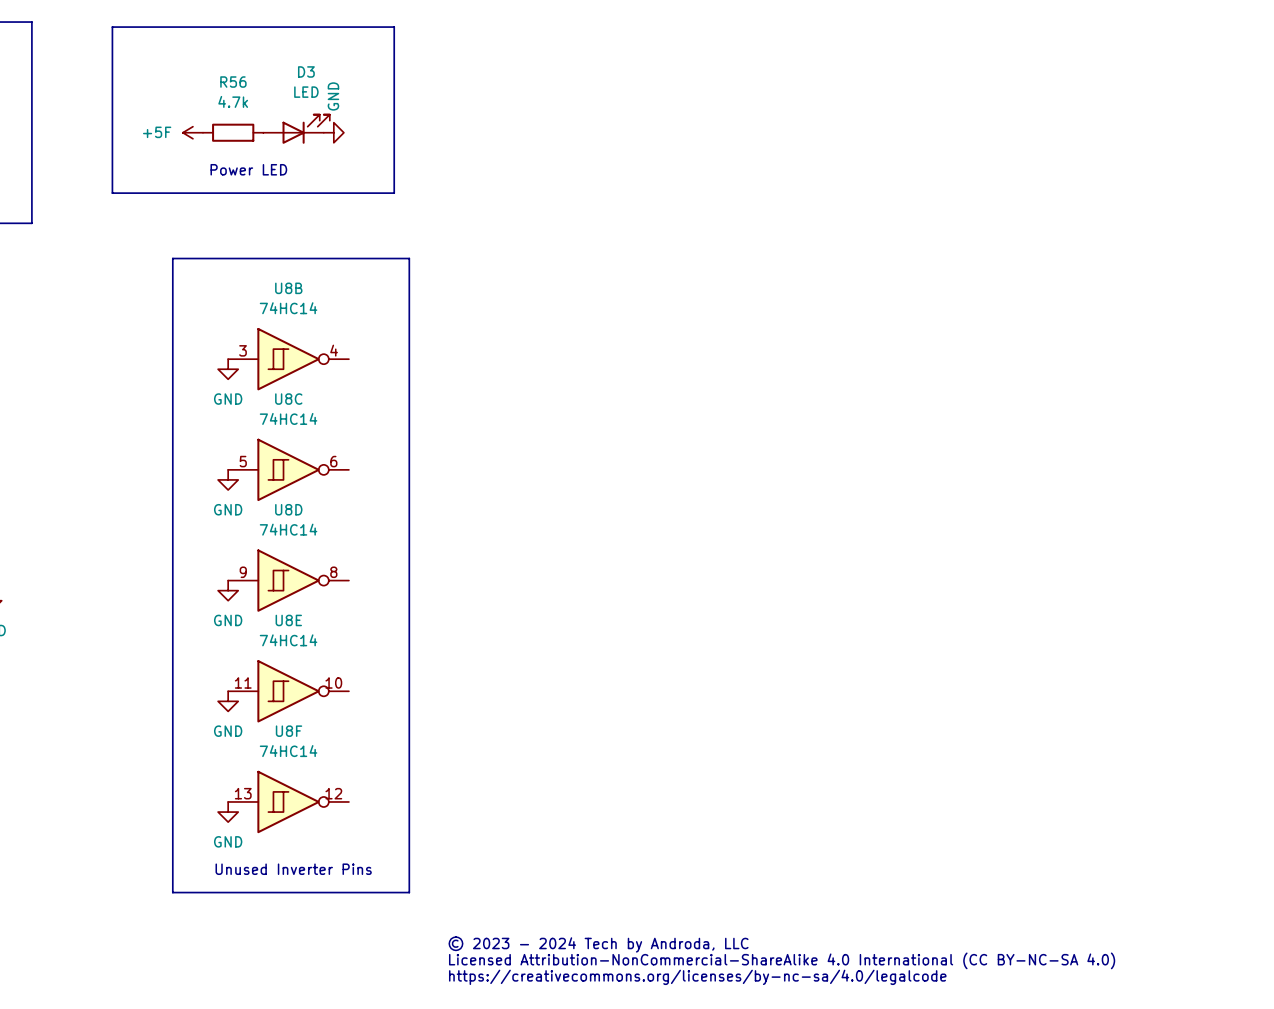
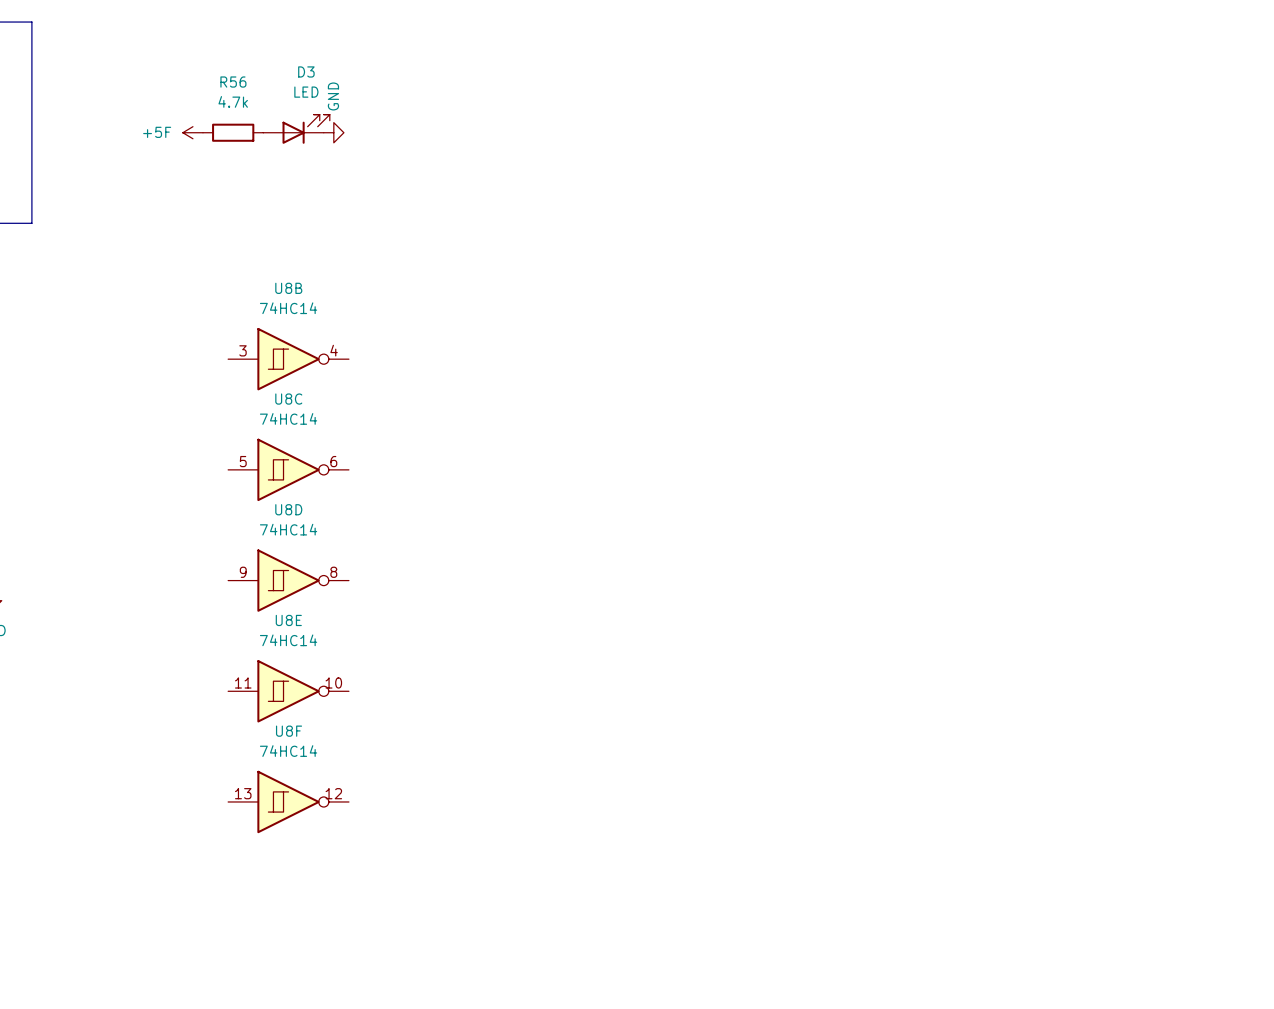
line: (112, 27) (394, 27) (394, 193) (112, 193) (112, 27) -> none
text: Power LED (248, 169) -> none
line: (172, 258) (172, 892) (409, 892) (409, 258) (172, 258) -> none
power symbol: GND (228, 369) -> none
power symbol: GND (228, 479) -> none
power symbol: GND (228, 590) -> none
power symbol: GND (228, 701) -> none
power symbol: GND (228, 812) -> none
text: Unused Inverter Pins (293, 869) -> none
text: © 2023 - 2024 Tech by Androda, LLC (598, 944) -> none
text: Licensed Attribution-NonCommercial-ShareAlike 4.0 International (CC BY-NC-SA 4.0) (782, 960) -> none
text: https://creativecommons.org/licenses/by-nc-sa/4.0/legalcode (697, 977) -> none

